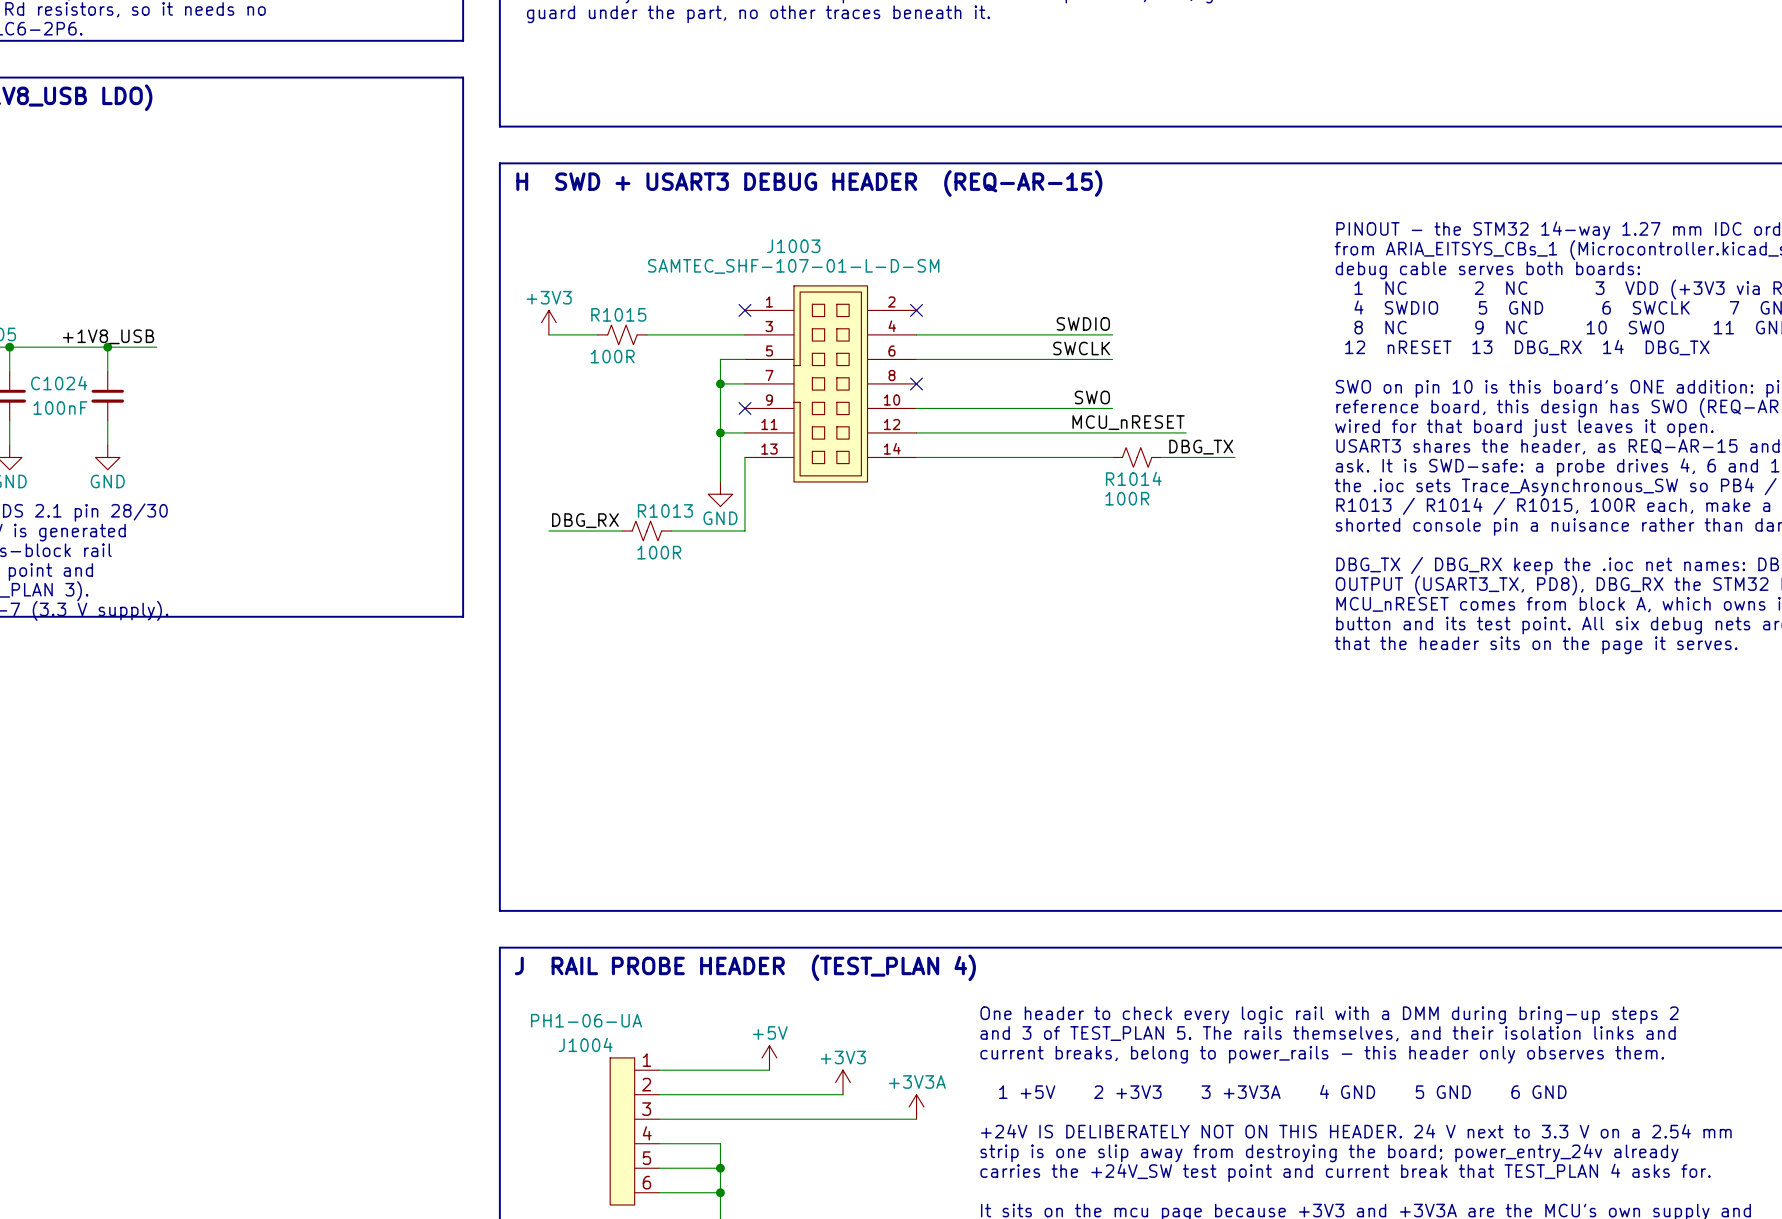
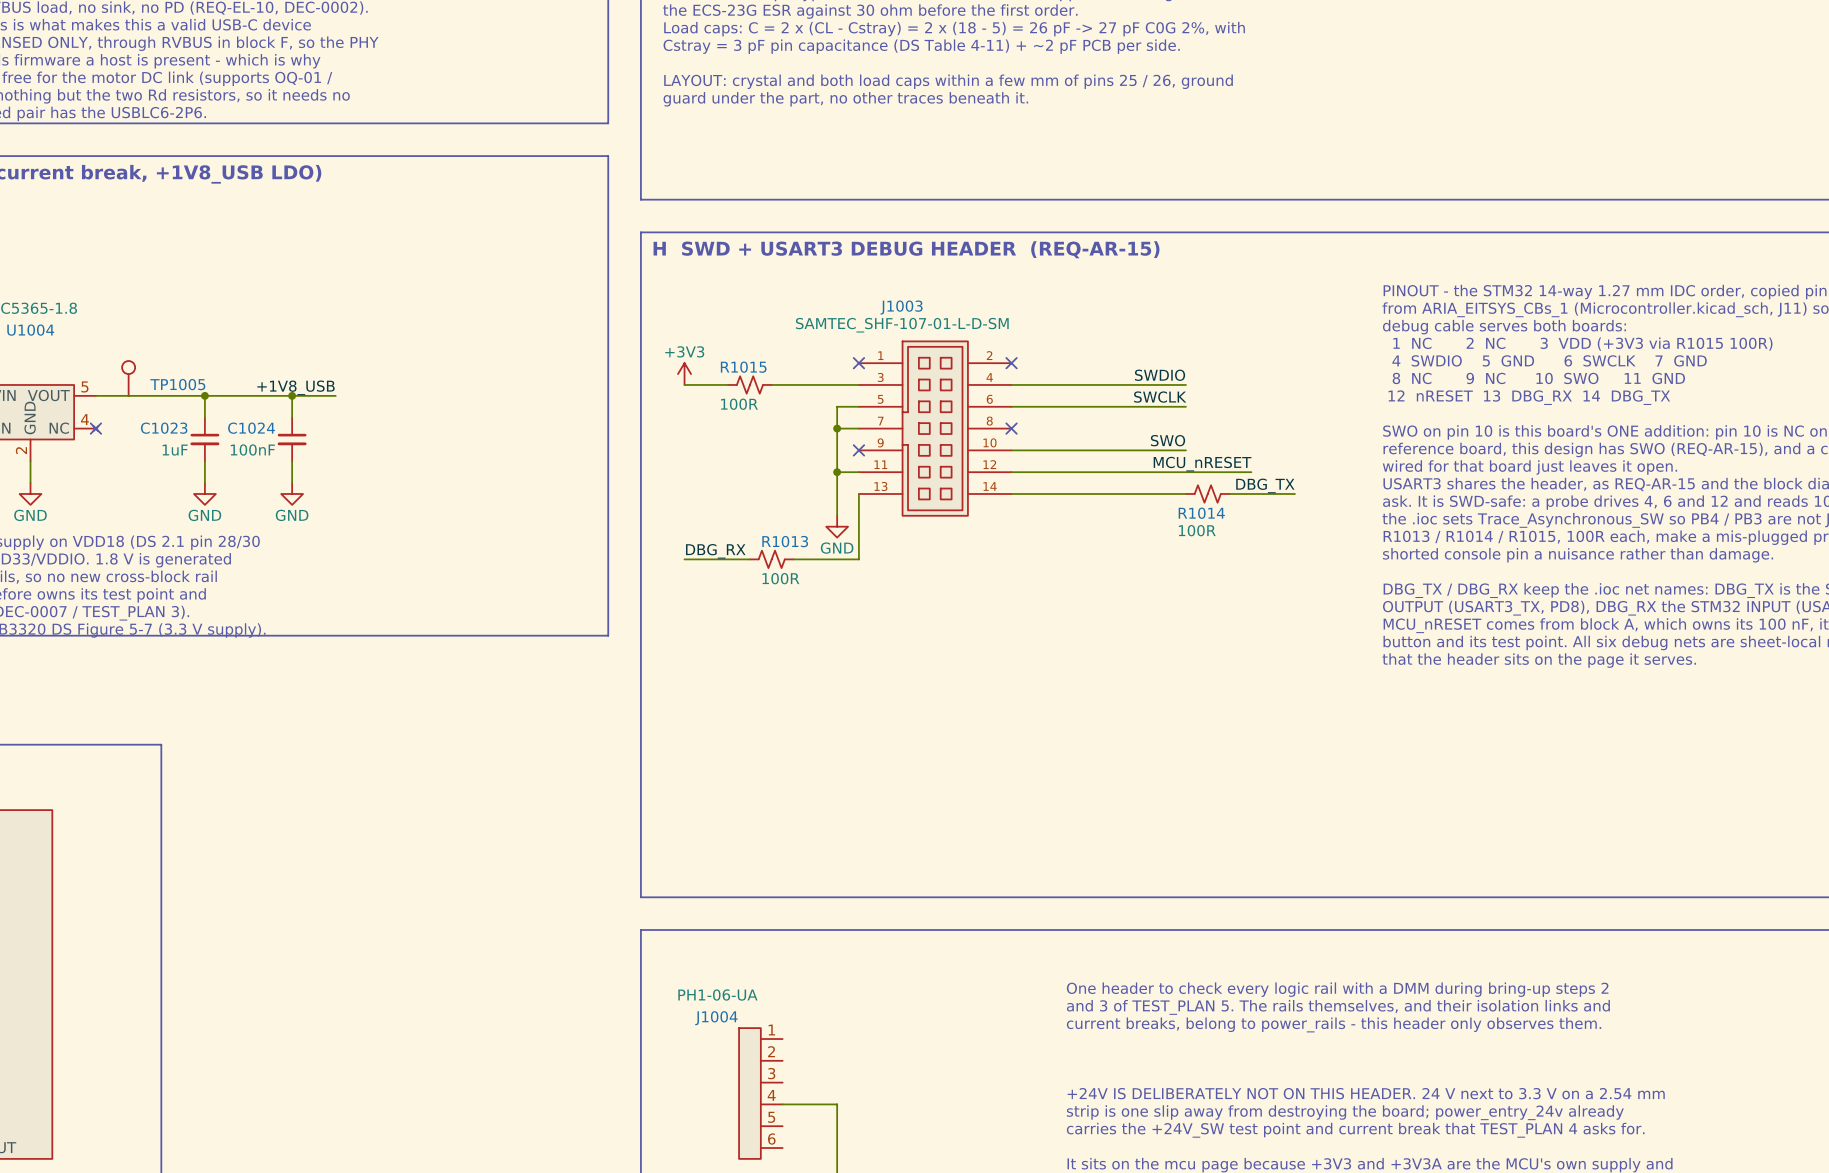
text: J RAIL PROBE HEADER (TEST_PLAN 4) (745, 967) -> none
power symbol: +5V (769, 1057) -> none
wire: (659, 1070) (769, 1070) -> none
power symbol: +3V3 (843, 1082) -> none
text: 1 +5V 2 +3V3 3 +3V3A 4 GND 5 GND 6 GND (1282, 1091) -> none
wire: (659, 1094) (843, 1094) -> none
power symbol: +3V3A (916, 1106) -> none
wire: (659, 1119) (916, 1119) -> none
wire: (659, 1168) (720, 1168) -> none
junction: (720, 1168) -> none
wire: (659, 1192) (720, 1192) -> none
junction: (720, 1192) -> none

